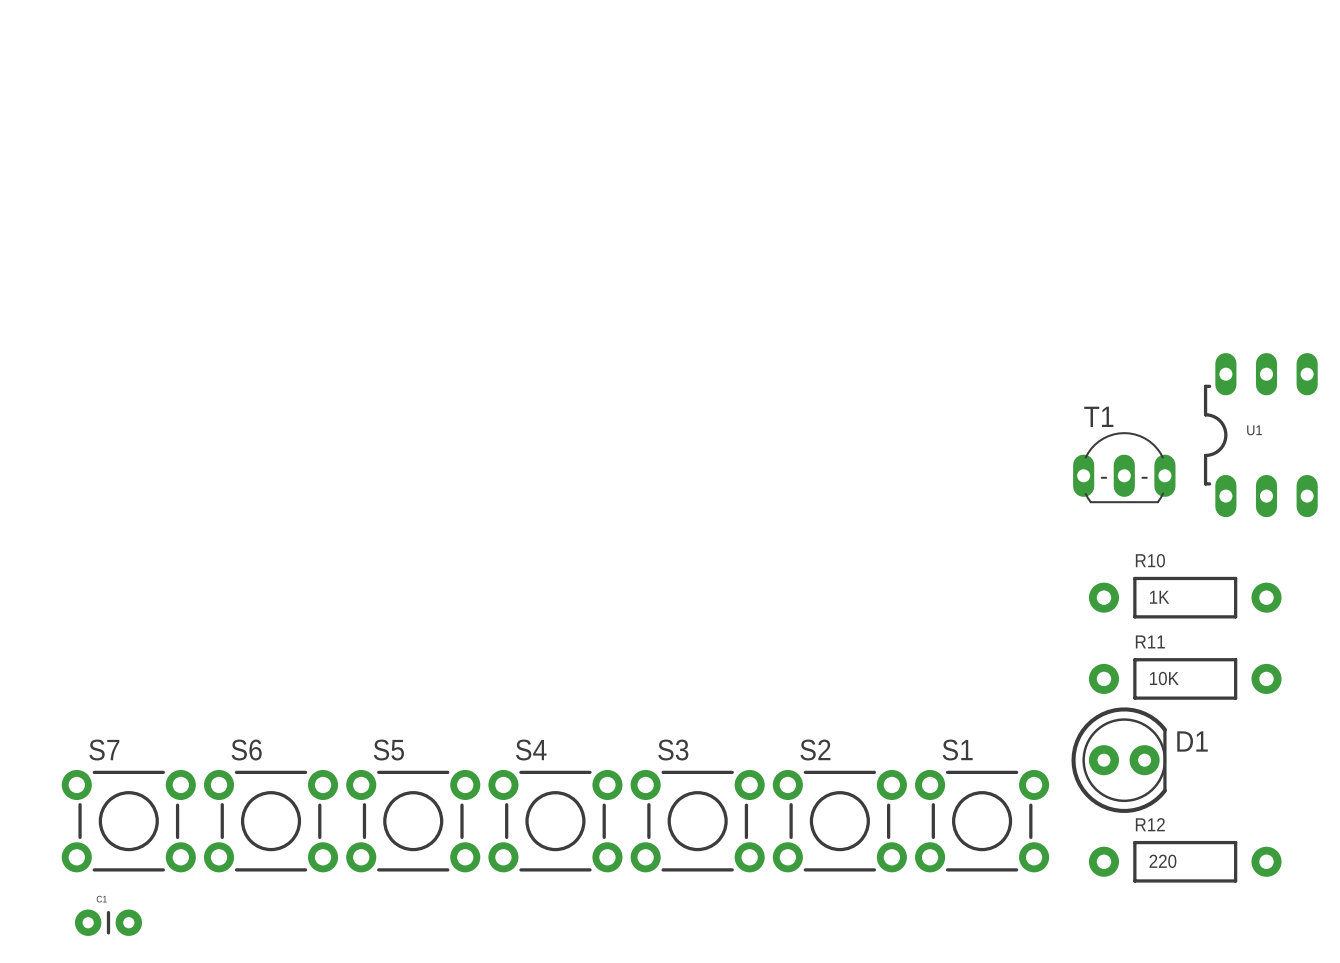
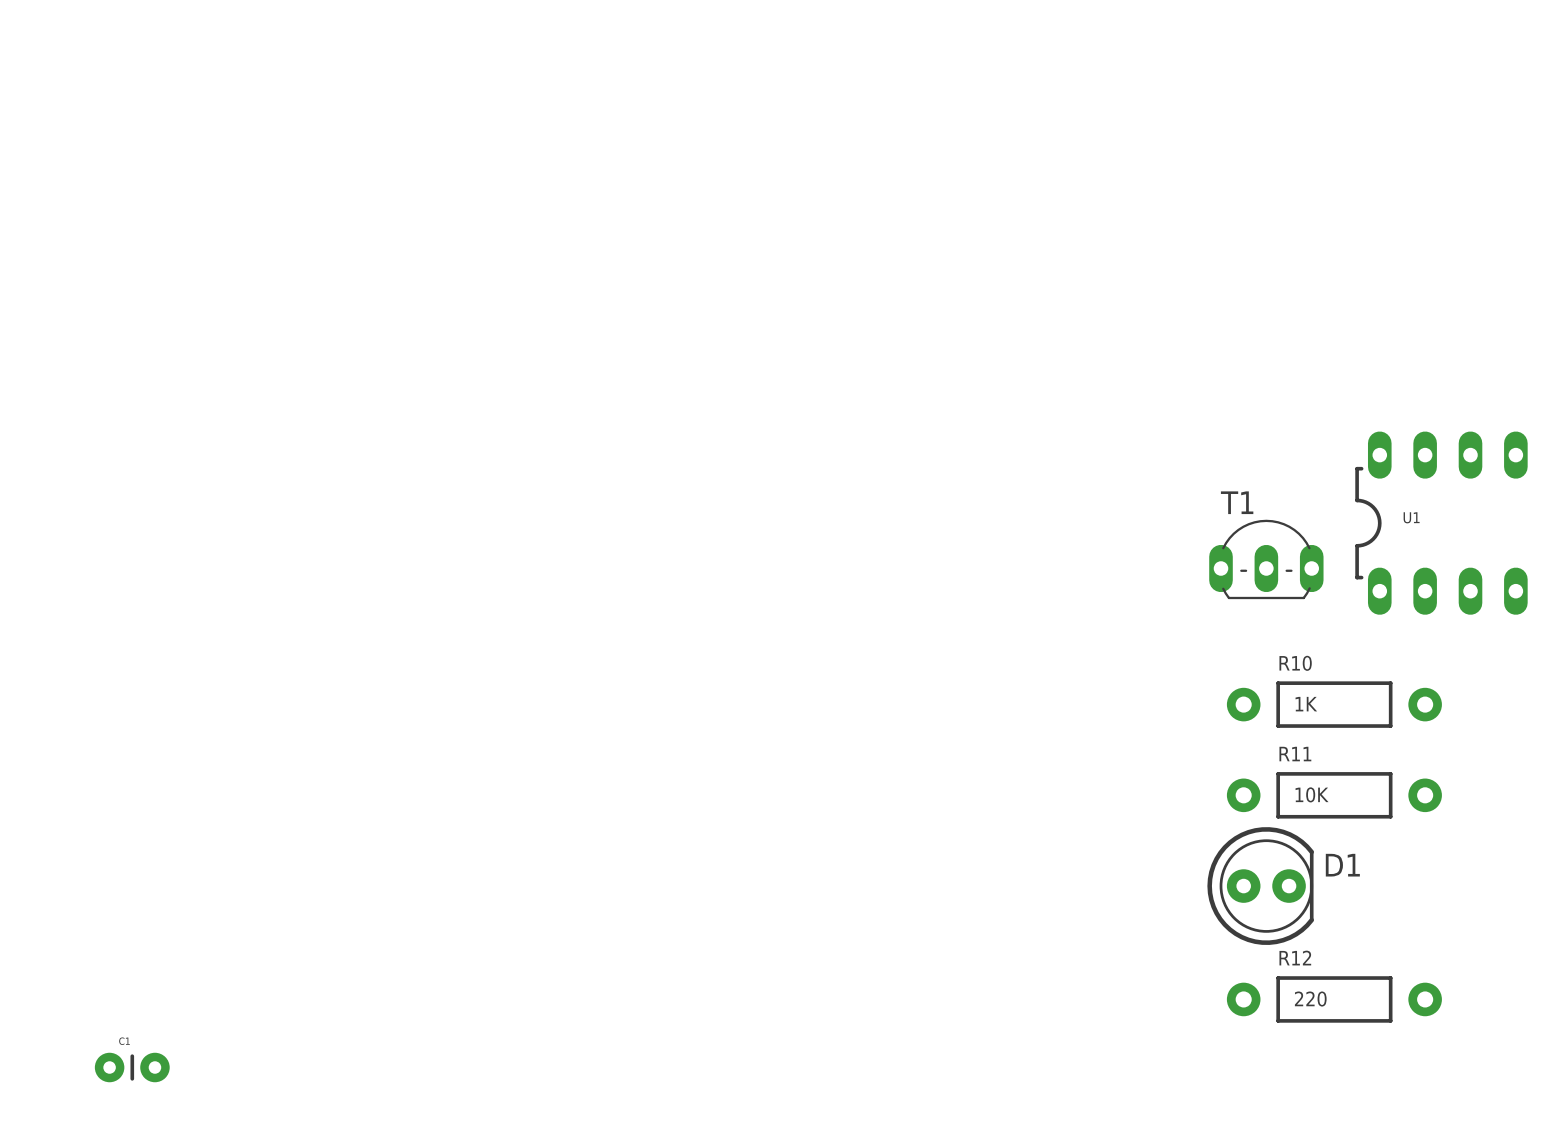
S7: (128, 821) -> none
S6: (271, 821) -> none
S5: (413, 821) -> none
S4: (555, 821) -> none
S3: (697, 821) -> none
S2: (839, 821) -> none
S1: (982, 821) -> none

